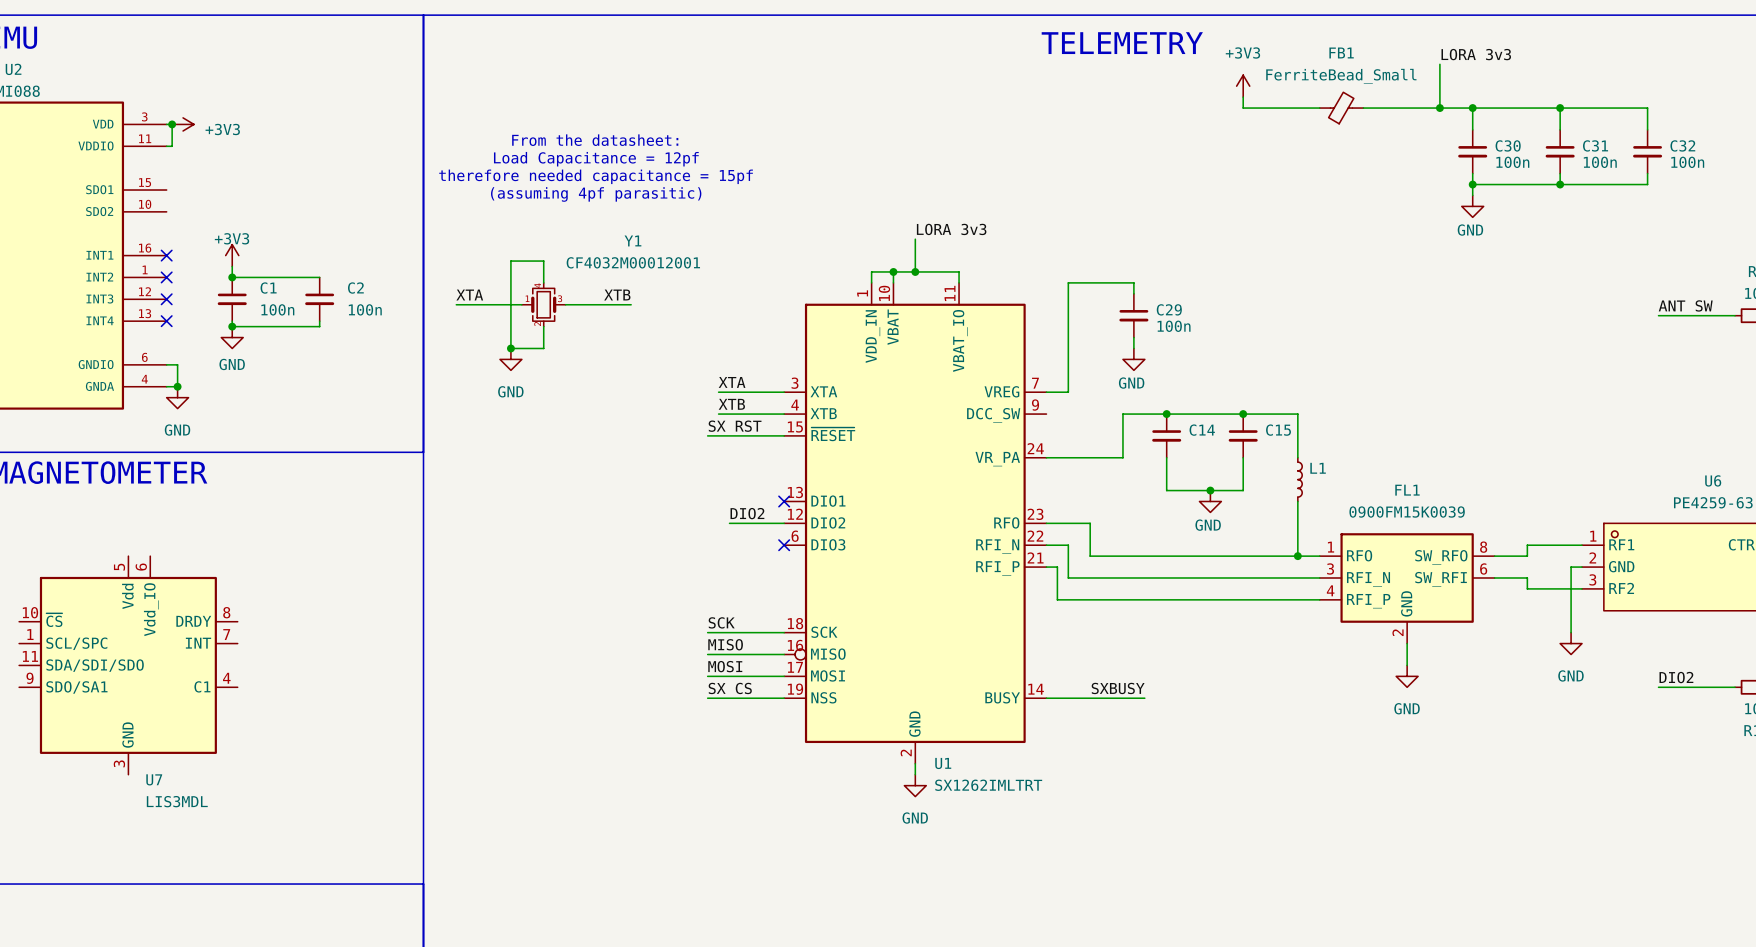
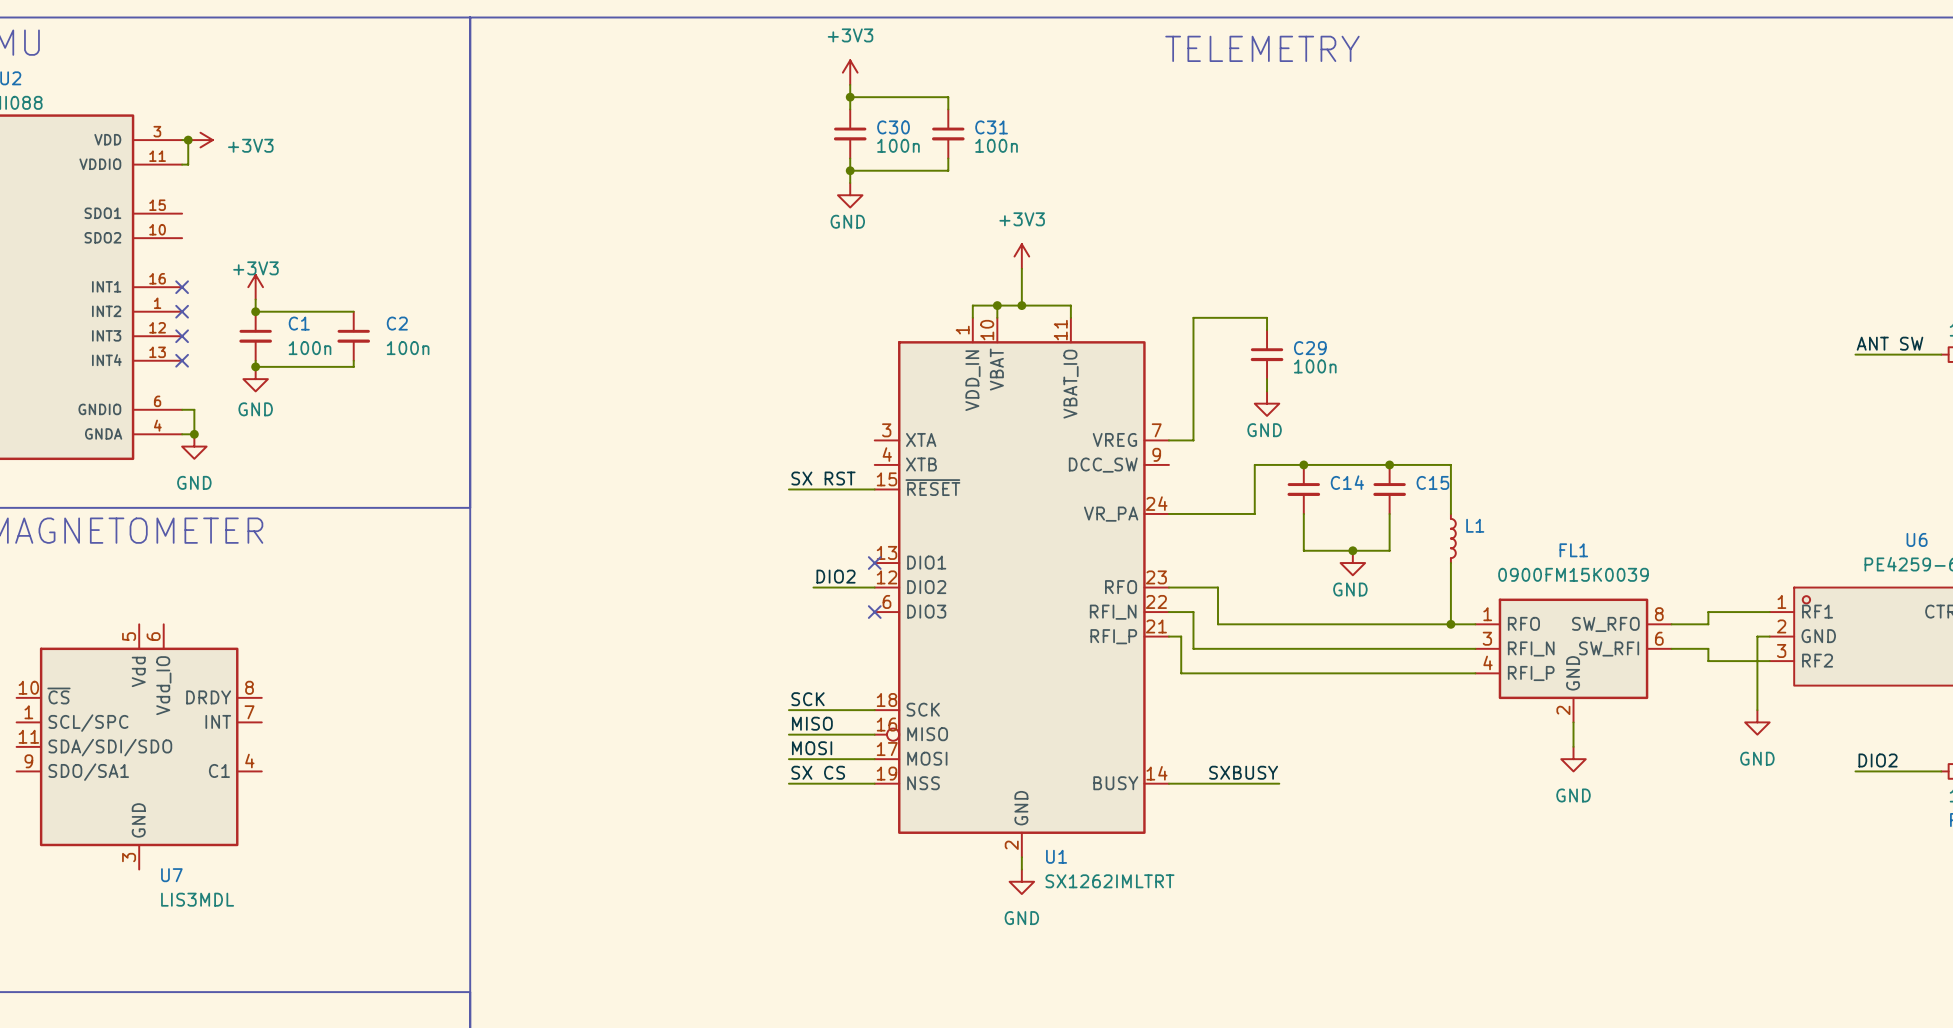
label: LORA 3v3 (1476, 54) -> none
power symbol: none -> +3V3 (850, 72)
wire: (1439, 64) (1439, 108) -> none
wire: none -> (850, 84) (850, 109)
wire: none -> (850, 97) (948, 97) (948, 109)
junction: none -> (850, 97)
power symbol: +3V3 (1243, 86) -> none
wire: (1243, 97) (1243, 108) (1319, 108) -> none
FB1: FerriteBead_Small (1341, 108) -> none
wire: (1363, 108) (1647, 108) (1647, 129) -> none
junction: (1439, 108) -> none
wire: (1472, 108) (1472, 129) -> none
junction: (1472, 108) -> none
wire: (1560, 108) (1560, 129) -> none
junction: (1560, 108) -> none
text: From the datasheet: (595, 140) -> none
wire: none -> (850, 158) (850, 182)
wire: none -> (948, 158) (948, 170) (850, 170)
junction: none -> (850, 170)
C30 position: (1472, 151) -> (850, 133)
C31 position: (1560, 151) -> (948, 133)
C32: 100n (1647, 151) -> none
text: Load Capacitance = 12pf (596, 159) -> none
power symbol: none -> GND (850, 195)
wire: (1472, 173) (1472, 195) -> none
wire: (1560, 173) (1560, 184) -> none
wire: (1647, 173) (1647, 184) (1472, 184) -> none
text: therefore needed capacitance = 15pf (596, 176) -> none
junction: (1472, 184) -> none
junction: (1560, 184) -> none
text: (assuming 4pf parasitic) (596, 194) -> none
power symbol: GND (1472, 206) -> none
power symbol: none -> +3V3 (1021, 256)
label: LORA 3v3 (951, 229) -> none
wire: (543, 282) (543, 261) (510, 261) (510, 348) (543, 348) (543, 326) -> none
label: XTA (469, 295) -> none
label: XTB (617, 295) -> none
wire: (456, 304) (521, 304) -> none
Y1: CF4032M00012001 (543, 304) -> none
wire: (565, 304) (631, 304) -> none
junction: (510, 348) -> none
power symbol: GND (510, 359) -> none
label: XTA (732, 382) -> none
wire: (718, 392) (784, 392) -> none
label: XTB (731, 404) -> none
wire: (718, 414) (784, 414) -> none

